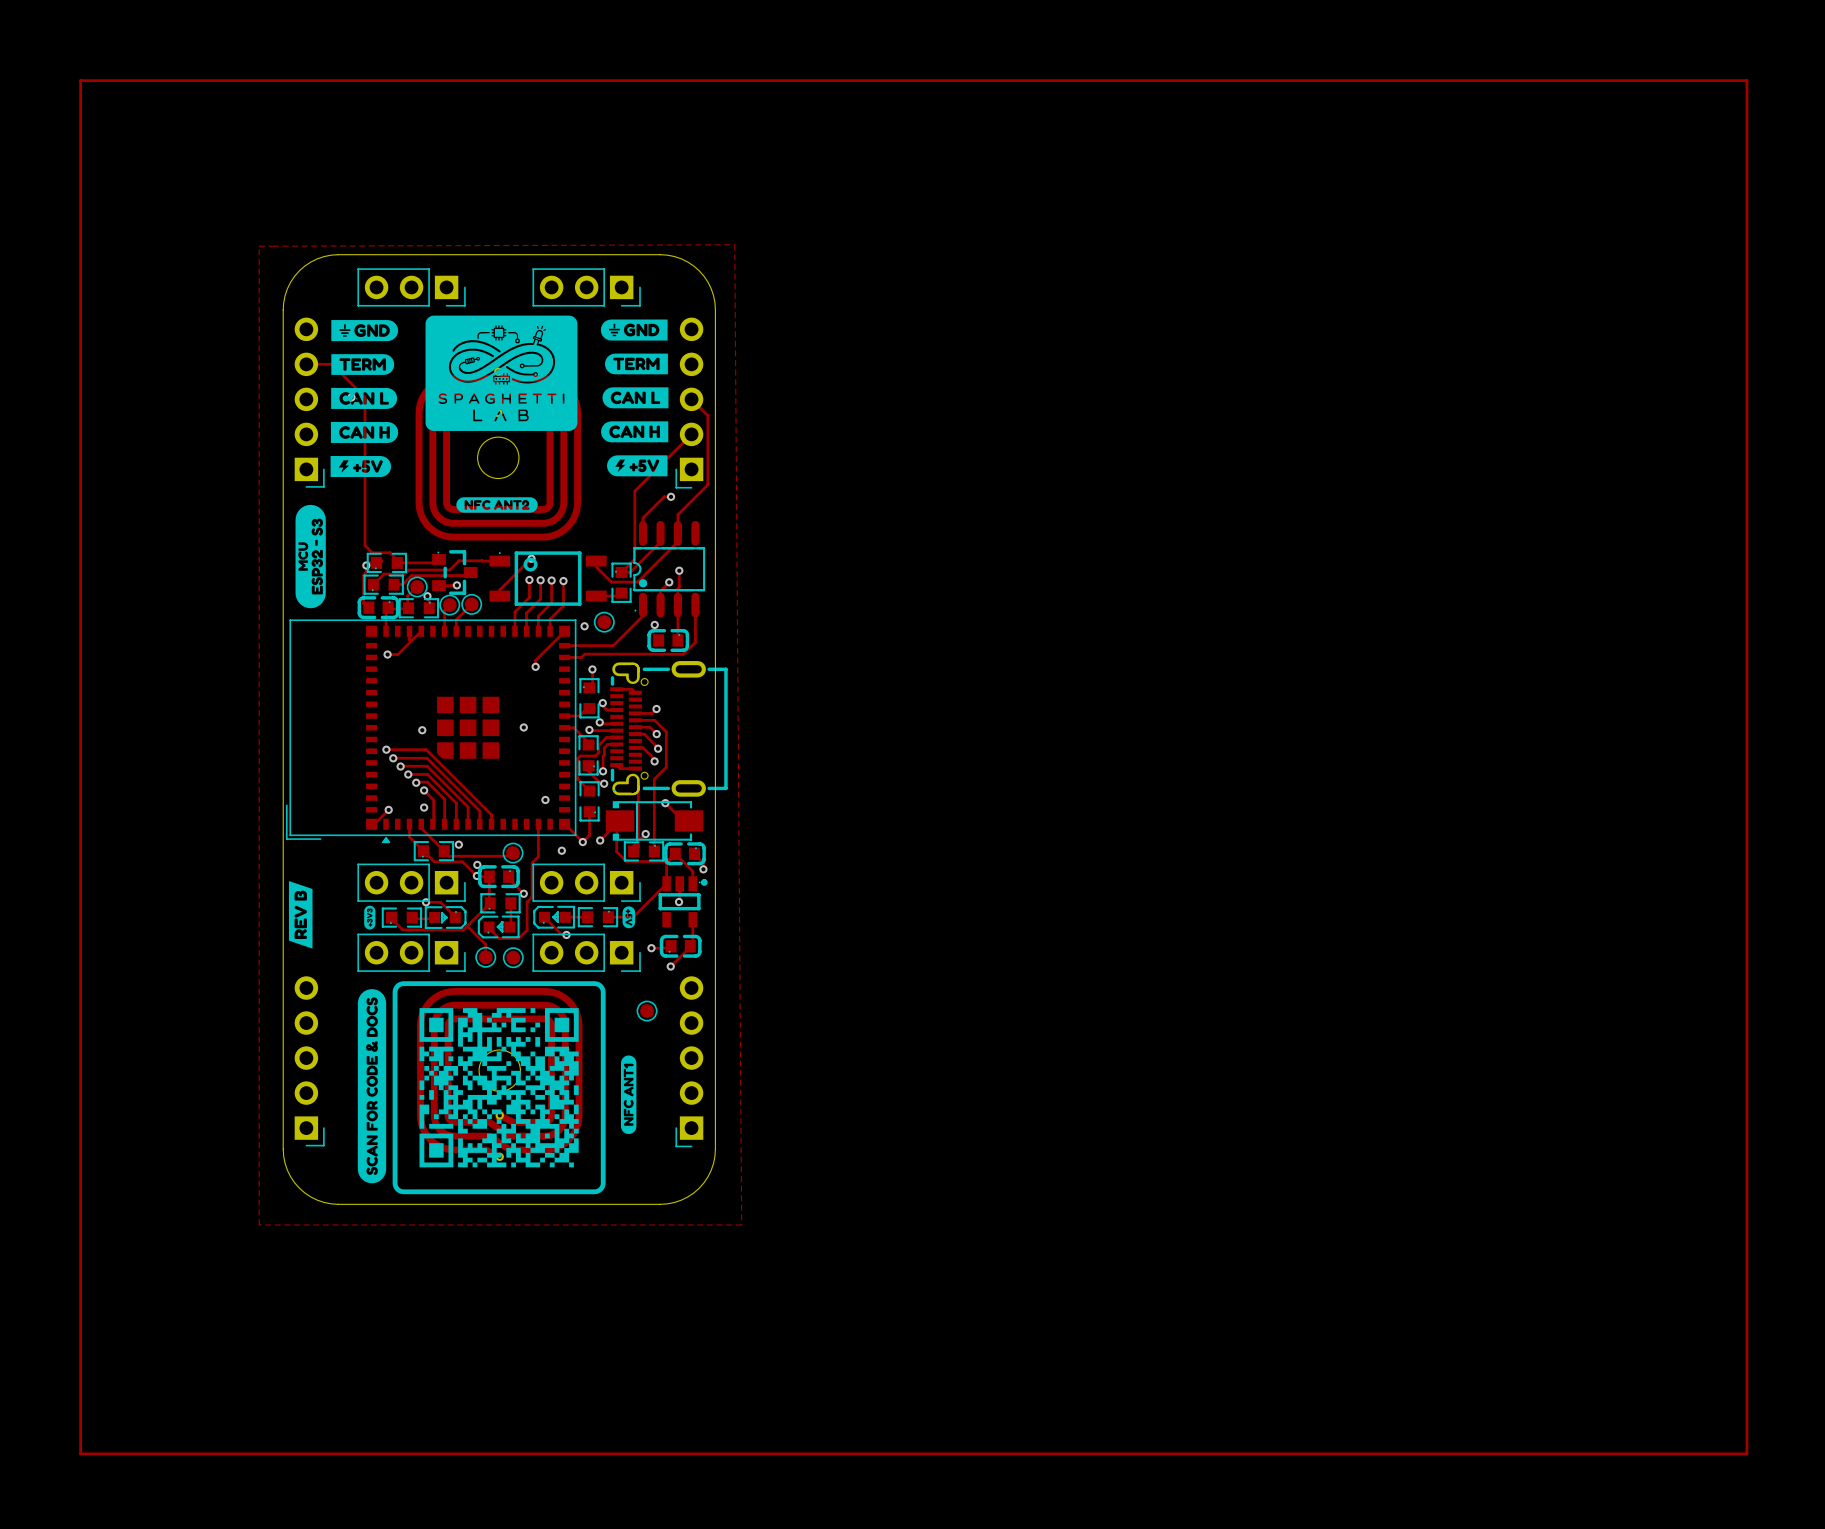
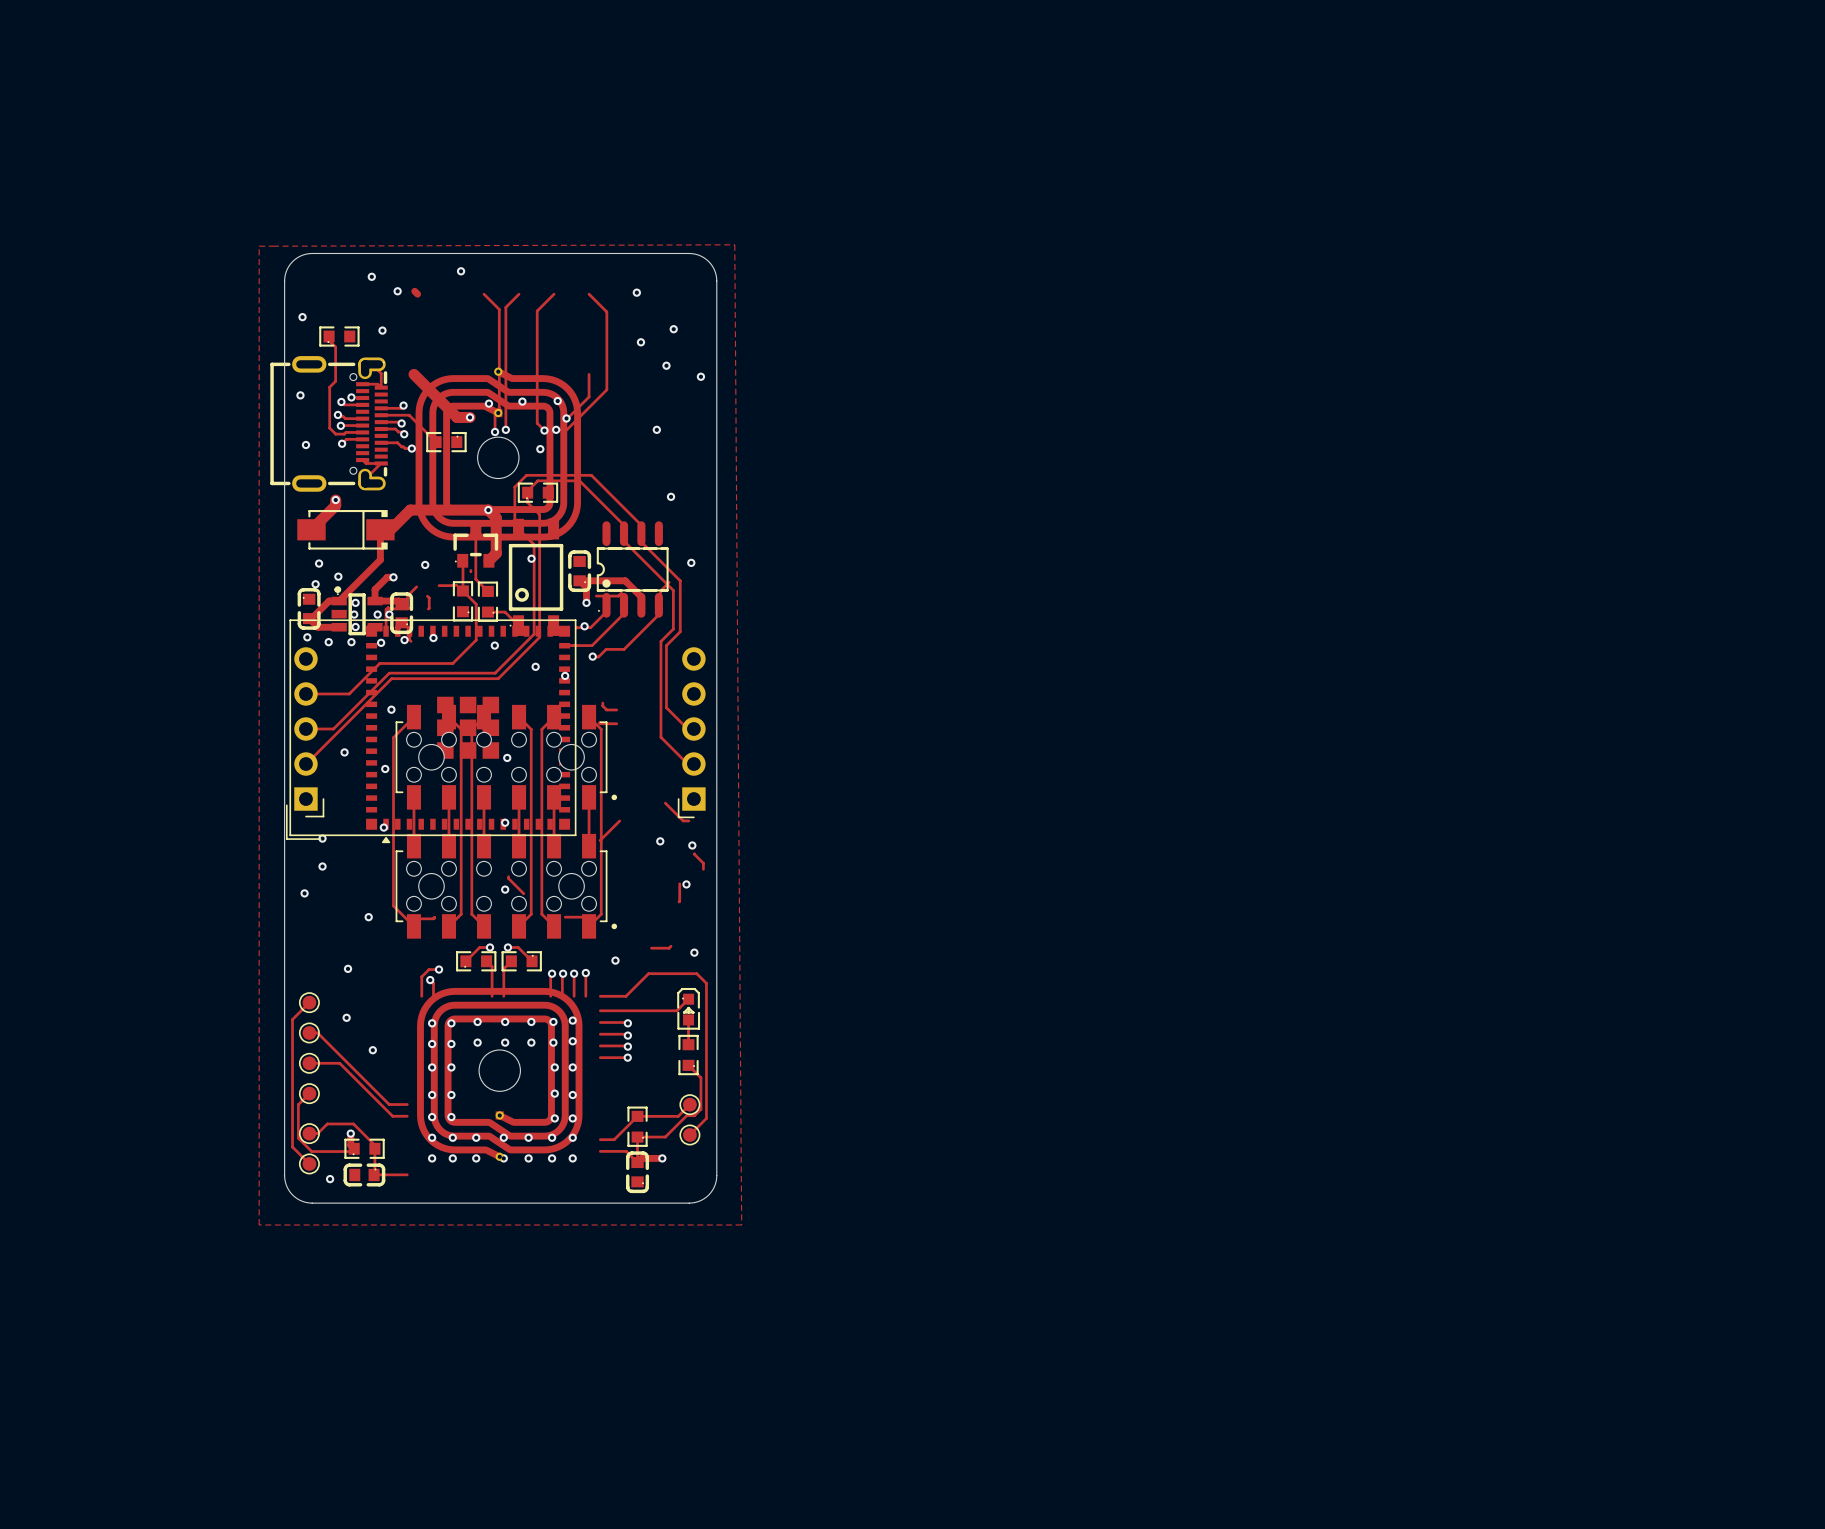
track: (80, 80) (1746, 80) (1746, 1453) (80, 1453) (80, 80) -> none
board edge: (338, 254) (667, 255) (681, 258) (693, 266) (704, 276) (711, 288) (715, 309) (715, 1149) (713, 1163) (704, 1182) (693, 1192) (681, 1200) (660, 1204) (331, 1203) (317, 1200) (304, 1192) (294, 1182) (287, 1170) (283, 1149) (283, 309) (287, 288) (299, 270) (317, 258) (338, 254) -> (312, 253) (300, 256) (292, 261) (286, 271) (284, 281) (284, 1175) (286, 1184) (294, 1197) (303, 1201) (312, 1203) (689, 1203) (698, 1201) (706, 1197) (712, 1190) (716, 1175) (716, 281) (715, 271) (706, 259) (698, 255) (689, 253) (312, 253)
via: none -> (461, 271)
via: none -> (371, 276)
part: (411, 287) -> none
part: (586, 287) -> none
via: none -> (397, 291)
track: none -> (414, 291) (417, 294)
via: none -> (636, 292)
track: none -> (484, 294) (499, 309) (499, 408) (495, 412) (495, 432)
track: none -> (519, 294) (505, 307) (505, 429)
track: none -> (554, 294) (537, 311) (537, 423) (544, 430)
track: none -> (589, 294) (606, 311) (606, 389) (566, 429) (556, 429)
drawing: [425, 315, 578, 431] -> none
via: none -> (302, 317)
drawing: [600, 319, 669, 477] -> none
drawing: [330, 320, 399, 478] -> none
via: none -> (673, 329)
via: none -> (382, 330)
track: none -> (329, 336) (330, 342) (335, 346) (335, 381) (329, 387) (329, 428) (335, 434) (362, 432)
part: none -> (339, 336)
via: none -> (640, 342)
track: (306, 364) (332, 364) (364, 397) (364, 545) (372, 552) (390, 552) (400, 562) -> none
track: none -> (372, 364) (381, 373) (381, 387) (377, 384) (362, 384)
via: none -> (666, 365)
track: none -> (413, 374) (457, 417) (470, 417)
track: none -> (589, 374) (589, 396) (566, 418)
via: none -> (700, 376)
via: none -> (300, 395)
track: (691, 399) (707, 415) (707, 484) (677, 514) (677, 541) (637, 582) (611, 582) (596, 566) (596, 561) -> none
track: none -> (341, 401) (344, 404) (362, 404)
via: none -> (341, 401)
via: none -> (522, 401)
via: none -> (557, 401)
part position: (309, 402) -> (309, 732)
via: none -> (488, 403)
part position: (689, 403) -> (691, 732)
track: none -> (403, 405) (400, 408) (381, 408)
via: none -> (403, 405)
track: none -> (337, 414) (345, 418) (362, 418)
via: none -> (337, 414)
track: none -> (381, 415) (409, 415) (436, 442)
via: none -> (470, 417)
via: none -> (566, 418)
track: none -> (381, 422) (401, 423)
part: none -> (329, 423)
via: none -> (401, 423)
via: none -> (340, 425)
track: none -> (362, 425) (340, 425)
track: none -> (381, 429) (395, 429) (398, 432) (403, 432) (404, 434)
via: none -> (505, 429)
via: none -> (556, 429)
via: none -> (656, 429)
via: none -> (544, 430)
via: none -> (495, 432)
via: none -> (404, 434)
track: (691, 434) (634, 491) (634, 559) (621, 572) (630, 572) (660, 542) (660, 533) -> none
track: none -> (362, 439) (346, 439) (342, 443)
track: none -> (381, 442) (397, 442) (405, 448) (411, 448)
part: none -> (446, 442)
via: none -> (342, 443)
via: none -> (305, 445)
via: none -> (411, 448)
via: none -> (540, 449)
track: none -> (362, 460) (366, 463) (381, 463)
track: none -> (380, 463) (365, 479)
part: none -> (537, 492)
track: (671, 496) (664, 496) (643, 517) (643, 533) -> none
drawing: [456, 497, 538, 513] -> none
track: none -> (335, 500) (335, 505) (311, 529)
via: none -> (335, 500)
drawing: [295, 504, 326, 609] -> none
via: none -> (488, 510)
part: none -> (345, 529)
track: none -> (475, 529) (475, 579) (487, 591)
track: (531, 558) (499, 589) (499, 596) -> none
track: (439, 559) (435, 562) (397, 562) -> none
track: (382, 560) (380, 562) (368, 562) (366, 565) (366, 572) (363, 575) (363, 603) (368, 608) -> none
track: none -> (462, 560) (462, 591) (476, 604) (476, 640) (452, 663) (379, 663) (349, 693) (305, 693)
track: none -> (488, 560) (496, 553) (496, 517) (488, 510) (410, 510) (390, 529) (380, 529) (380, 559) (339, 601) (329, 601) (311, 618) (309, 618) (317, 627) (339, 627)
track: (499, 561) (458, 560) (449, 570) (408, 570) (404, 574) (384, 574) (373, 584) -> none
part: (386, 562) -> none
via: none -> (319, 563)
via: none -> (425, 564)
via: (366, 565) -> none
part position: (669, 569) -> (632, 569)
track: (679, 570) (677, 640) -> none
via position: (679, 570) -> (691, 562)
part: none -> (579, 571)
part rotation: 0° (454, 572) -> 90° counterclockwise (475, 544)
part position: (454, 572) -> (475, 544)
track: (470, 572) (467, 575) (411, 575) (402, 584) (394, 584) -> none
via: none -> (338, 576)
track: none -> (393, 577) (387, 577) (375, 589) (375, 601) (399, 601) (401, 603)
via: none -> (393, 577)
part rotation: 0° (548, 578) -> 90° counterclockwise (536, 577)
track: (529, 579) (529, 597) (514, 611) (514, 631) -> none
via: (529, 579) -> none
track: (540, 580) (540, 598) (526, 613) (526, 631) -> none
via: (540, 580) -> none
track: (551, 580) (551, 602) (538, 616) (538, 631) -> none
via: (551, 580) -> none
track: (563, 581) (563, 605) (550, 619) (550, 631) -> none
via: (563, 581) -> none
part: (621, 582) -> none
via: (669, 582) -> none
via: none -> (315, 584)
part: (383, 584) -> none
via: (456, 585) -> none
part: (417, 587) -> none
via: (427, 596) -> none
part: none -> (462, 601)
part: none -> (487, 601)
via: none -> (355, 602)
track: none -> (586, 602) (586, 587) (579, 580) (625, 580) (641, 596) (641, 605)
via: none -> (586, 602)
track: (471, 604) (456, 619) (456, 631) -> none
part: (471, 604) -> none
track: (449, 605) (444, 610) (444, 631) -> none
part: (449, 605) -> none
track: none -> (606, 605) (606, 611) (590, 627) (576, 628)
track: (643, 605) (643, 615) (613, 645) (592, 645) -> (624, 605) (624, 613) (592, 645)
track: none -> (658, 605) (658, 614) (624, 649) (606, 649) (598, 656) (592, 656)
track: (695, 605) (695, 642) -> none
part rotation: 0° (378, 607) -> 90° clockwise (401, 613)
part: none -> (309, 608)
part: (418, 608) -> none
part: none -> (357, 610)
track: none -> (487, 612) (505, 612) (518, 625)
via: none -> (354, 614)
via: none -> (377, 614)
via: none -> (389, 614)
part: (604, 622) -> none
via: (654, 624) -> none
via: none -> (355, 626)
track: (421, 631) (397, 654) (387, 654) -> none
track: (564, 631) (535, 660) (535, 666) -> none
via: none -> (307, 637)
via: none -> (433, 638)
via: none -> (404, 640)
part: (668, 640) -> none
via: none -> (328, 642)
via: none -> (351, 642)
via: none -> (381, 642)
track: (695, 642) (683, 654) (584, 654) (581, 657) (564, 657) -> none
via: none -> (494, 645)
via: (387, 654) -> none
via position: (592, 669) -> (592, 656)
track: (592, 671) (592, 684) (589, 687) -> none
via: none -> (565, 675)
track: (616, 689) (631, 689) (635, 692) -> none
part: (589, 698) -> none
via: (602, 703) -> none
track: (589, 708) (586, 708) (579, 716) (564, 716) -> none
via: none -> (391, 709)
track: (656, 709) (652, 713) (635, 713) -> none
via: (656, 709) -> none
track: none -> (413, 717) (393, 737) (393, 905) (413, 926)
track: none -> (449, 717) (461, 729) (461, 914) (449, 926)
track: none -> (484, 717) (471, 729) (471, 914) (484, 926)
track: none -> (519, 717) (531, 729) (531, 914) (519, 926)
track: none -> (554, 717) (541, 729) (541, 914) (554, 926)
track: none -> (589, 717) (601, 729) (601, 914) (589, 926)
track: (635, 720) (654, 720) (666, 732) (666, 767) (654, 779) (654, 851) -> none
via: (599, 722) -> none
via: (523, 727) -> none
track: (564, 727) (573, 727) (589, 744) -> none
track: (635, 727) (649, 727) (656, 734) -> none
track: none -> (305, 728) (333, 728) (389, 673) (495, 673) (534, 634) (534, 544) (514, 525) (514, 487) (526, 475) (591, 475) (641, 525) (641, 542) (680, 580) (680, 631) (666, 645) (666, 707) (687, 728) (697, 728)
part: (668, 728) -> none
track: (589, 729) (616, 730) -> none
via: (589, 729) -> none
via: (422, 730) -> none
track: (635, 734) (644, 734) (658, 748) -> none
via: (656, 734) -> none
track: (616, 737) (606, 737) (598, 745) (598, 752) (595, 755) (580, 755) (577, 758) (577, 779) (589, 791) -> none
track: (616, 744) (607, 744) (604, 747) (603, 771) -> none
track: (635, 747) (643, 747) (654, 761) -> none
via: (658, 748) -> none
track: (386, 749) (426, 749) (491, 815) (491, 824) -> none
via: (386, 749) -> none
via: none -> (344, 752)
part: (588, 755) -> none
part: none -> (506, 757)
via: none -> (507, 757)
track: (393, 758) (427, 758) (479, 811) (479, 824) -> none
via: (393, 758) -> none
via: (654, 761) -> none
track: none -> (302, 764) (306, 764) (391, 678) (498, 678) (539, 637) (539, 514) (527, 502) (527, 491) (537, 480) (579, 480) (624, 525) (624, 541) (673, 590) (673, 629) (660, 641) (660, 737) (687, 764) (697, 764)
track: (588, 765) (588, 771) (600, 783) (604, 783) -> none
track: (616, 765) (620, 768) (635, 768) -> none
track: (400, 766) (427, 766) (468, 807) (468, 824) -> none
via: (400, 766) -> none
via: none -> (385, 768)
via: (603, 771) -> none
track: (408, 774) (427, 774) (456, 803) (456, 824) -> none
via: (408, 774) -> none
track: (416, 782) (427, 782) (444, 799) (444, 824) -> none
via: (416, 782) -> none
via: (604, 783) -> none
track: (632, 784) (638, 789) (638, 846) (633, 851) (633, 846) (645, 834) -> none
track: (424, 790) (433, 799) (432, 824) -> none
via: (424, 790) -> none
track: none -> (413, 797) (413, 846)
track: none -> (449, 797) (449, 846)
track: none -> (484, 797) (484, 846)
track: none -> (519, 797) (519, 846)
track: none -> (554, 797) (554, 846)
track: none -> (589, 797) (589, 846)
via: (545, 799) -> none
part: (589, 801) -> none
via: (665, 803) -> none
via: (424, 807) -> none
track: (388, 809) (374, 824) (371, 824) -> none
via position: (388, 809) -> (383, 827)
track: (589, 811) (589, 835) (582, 842) (564, 824) -> none
track: (620, 820) (616, 824) (616, 851) (626, 861) (667, 861) -> none
part: (654, 820) -> none
via: none -> (505, 822)
track: (409, 824) (409, 837) (434, 861) (462, 861) (476, 875) -> none
track: (421, 824) (421, 828) (449, 856) (509, 856) (513, 853) -> none
track: (538, 824) (538, 856) (532, 862) (532, 897) (527, 902) -> none
via position: (645, 834) -> (660, 841)
via: none -> (322, 838)
via: (600, 840) -> none
via: (582, 842) -> none
via: (458, 844) -> none
via: none -> (692, 845)
via: (561, 850) -> none
part: (433, 851) -> none
part: (644, 851) -> none
part: (513, 853) -> none
part: (684, 853) -> none
via: (477, 864) -> none
via: none -> (322, 866)
via: (703, 869) -> none
track: (476, 875) (489, 876) (490, 903) (463, 929) (402, 929) (391, 917) -> none
via: (476, 875) -> none
part: (498, 876) -> none
drawing: [288, 881, 313, 949] -> none
part: (411, 882) -> none
part: (586, 882) -> none
track: (692, 883) (692, 871) (675, 853) (666, 862) (666, 883) (633, 917) (608, 916) -> none
via: none -> (686, 884)
part: none -> (506, 886)
via: none -> (505, 889)
via: none -> (304, 893)
via: (523, 893) -> none
part: (683, 901) -> none
track: (426, 902) (440, 902) (455, 917) -> none
via: (426, 902) -> none
track: (527, 902) (527, 930) (518, 938) (499, 938) (489, 927) -> none
via: (679, 902) -> none
part: (500, 903) -> none
track: (510, 903) (509, 927) -> none
drawing: [364, 905, 376, 930] -> none
drawing: [622, 906, 636, 929] -> none
via: none -> (368, 917)
part: (401, 917) -> none
part: (445, 917) -> none
track: (544, 917) (562, 934) (566, 934) -> none
part: (554, 917) -> none
part: (597, 917) -> none
track: (692, 919) (692, 944) (670, 966) -> none
track: (467, 926) (485, 944) (485, 957) -> none
part: (498, 926) -> none
via: (566, 934) -> none
part footprint: [475, 946, 497, 968] -> [456, 951, 497, 972]
part: (680, 946) -> none
track: none -> (490, 947) (479, 947) (465, 961)
via: none -> (490, 947)
part footprint: [502, 947, 524, 969] -> [501, 951, 542, 972]
track: none -> (507, 947) (518, 947) (532, 961)
via: none -> (507, 947)
via: (651, 948) -> none
part: (411, 952) -> none
part: (586, 952) -> none
via: none -> (694, 952)
via: none -> (615, 960)
track: none -> (486, 961) (492, 966) (492, 996)
track: none -> (511, 961) (503, 968) (503, 996)
via: (670, 966) -> none
via: none -> (348, 968)
track: none -> (439, 969) (429, 969) (421, 976) (421, 996)
via: none -> (439, 969)
track: none -> (585, 972) (585, 996)
track: none -> (552, 973) (550, 996)
via: none -> (552, 973)
track: none -> (563, 973) (562, 996)
via: none -> (563, 973)
track: none -> (574, 973) (574, 996)
via: none -> (574, 973)
via: none -> (585, 973)
part footprint: [294, 976, 325, 1147] -> [298, 1052, 320, 1074]
part footprint: [675, 976, 704, 1148] -> [678, 1034, 699, 1076]
track: none -> (430, 980) (433, 983) (433, 996)
via: none -> (430, 980)
drawing: [357, 981, 637, 1195] -> none
track: none -> (600, 996) (625, 996) (648, 973) (696, 973) (706, 983) (706, 1118) (689, 1134)
track: none -> (688, 999) (676, 1010) (600, 1010)
track: none -> (309, 1002) (292, 1019) (292, 1147) (309, 1163)
part: none -> (309, 1002)
part: none -> (688, 1008)
part: (647, 1011) -> none
via: none -> (346, 1017)
track: none -> (688, 1019) (688, 1044)
via: none -> (572, 1020)
via: none -> (477, 1021)
via: none -> (505, 1021)
via: none -> (531, 1021)
via: none -> (553, 1021)
track: none -> (600, 1022) (627, 1023)
via: none -> (432, 1023)
via: none -> (451, 1023)
via: none -> (627, 1023)
track: none -> (309, 1032) (317, 1032) (389, 1104) (407, 1104)
part: none -> (309, 1032)
track: none -> (600, 1034) (627, 1035)
via: none -> (627, 1035)
via: none -> (572, 1041)
via: none -> (477, 1042)
via: none -> (505, 1042)
via: none -> (531, 1042)
via: none -> (553, 1042)
via: none -> (432, 1044)
via: none -> (451, 1044)
track: none -> (600, 1045) (627, 1046)
via: none -> (627, 1046)
via: none -> (372, 1050)
track: none -> (600, 1057) (627, 1057)
via: none -> (627, 1057)
track: none -> (309, 1063) (339, 1063) (392, 1116) (407, 1116)
track: none -> (688, 1065) (700, 1077) (700, 1109) (694, 1115) (686, 1115) (665, 1137) (637, 1137) (637, 1162)
via: none -> (432, 1067)
via: none -> (451, 1067)
via: none -> (554, 1067)
via: none -> (572, 1067)
track: none -> (309, 1093) (298, 1104) (298, 1138) (311, 1151) (351, 1151) (354, 1148) (350, 1145) (350, 1133)
part: none -> (309, 1093)
via: none -> (554, 1093)
via: none -> (432, 1095)
via: none -> (451, 1095)
via: none -> (572, 1095)
track: none -> (689, 1104) (678, 1116) (637, 1116) (614, 1139) (600, 1139)
part: none -> (689, 1104)
via: none -> (432, 1117)
via: none -> (451, 1117)
via: none -> (554, 1118)
via: none -> (572, 1118)
part: none -> (637, 1126)
track: none -> (309, 1133) (317, 1133) (327, 1123) (353, 1123) (374, 1145) (374, 1174)
part: none -> (309, 1133)
via: none -> (350, 1133)
part: none -> (689, 1134)
via: none -> (432, 1137)
via: none -> (452, 1137)
via: none -> (476, 1137)
via: none -> (503, 1137)
via: none -> (528, 1137)
via: none -> (552, 1137)
via: none -> (572, 1137)
part: none -> (364, 1148)
track: none -> (600, 1151) (626, 1151) (637, 1162)
via: none -> (432, 1158)
via: none -> (452, 1158)
via: none -> (476, 1158)
via: none -> (503, 1158)
via: none -> (528, 1158)
via: none -> (552, 1158)
via: none -> (572, 1158)
track: none -> (662, 1158) (641, 1158) (637, 1162)
via: none -> (662, 1158)
part: none -> (309, 1163)
part: none -> (637, 1172)
part: none -> (364, 1174)
track: none -> (374, 1174) (407, 1174)
via: none -> (330, 1179)

